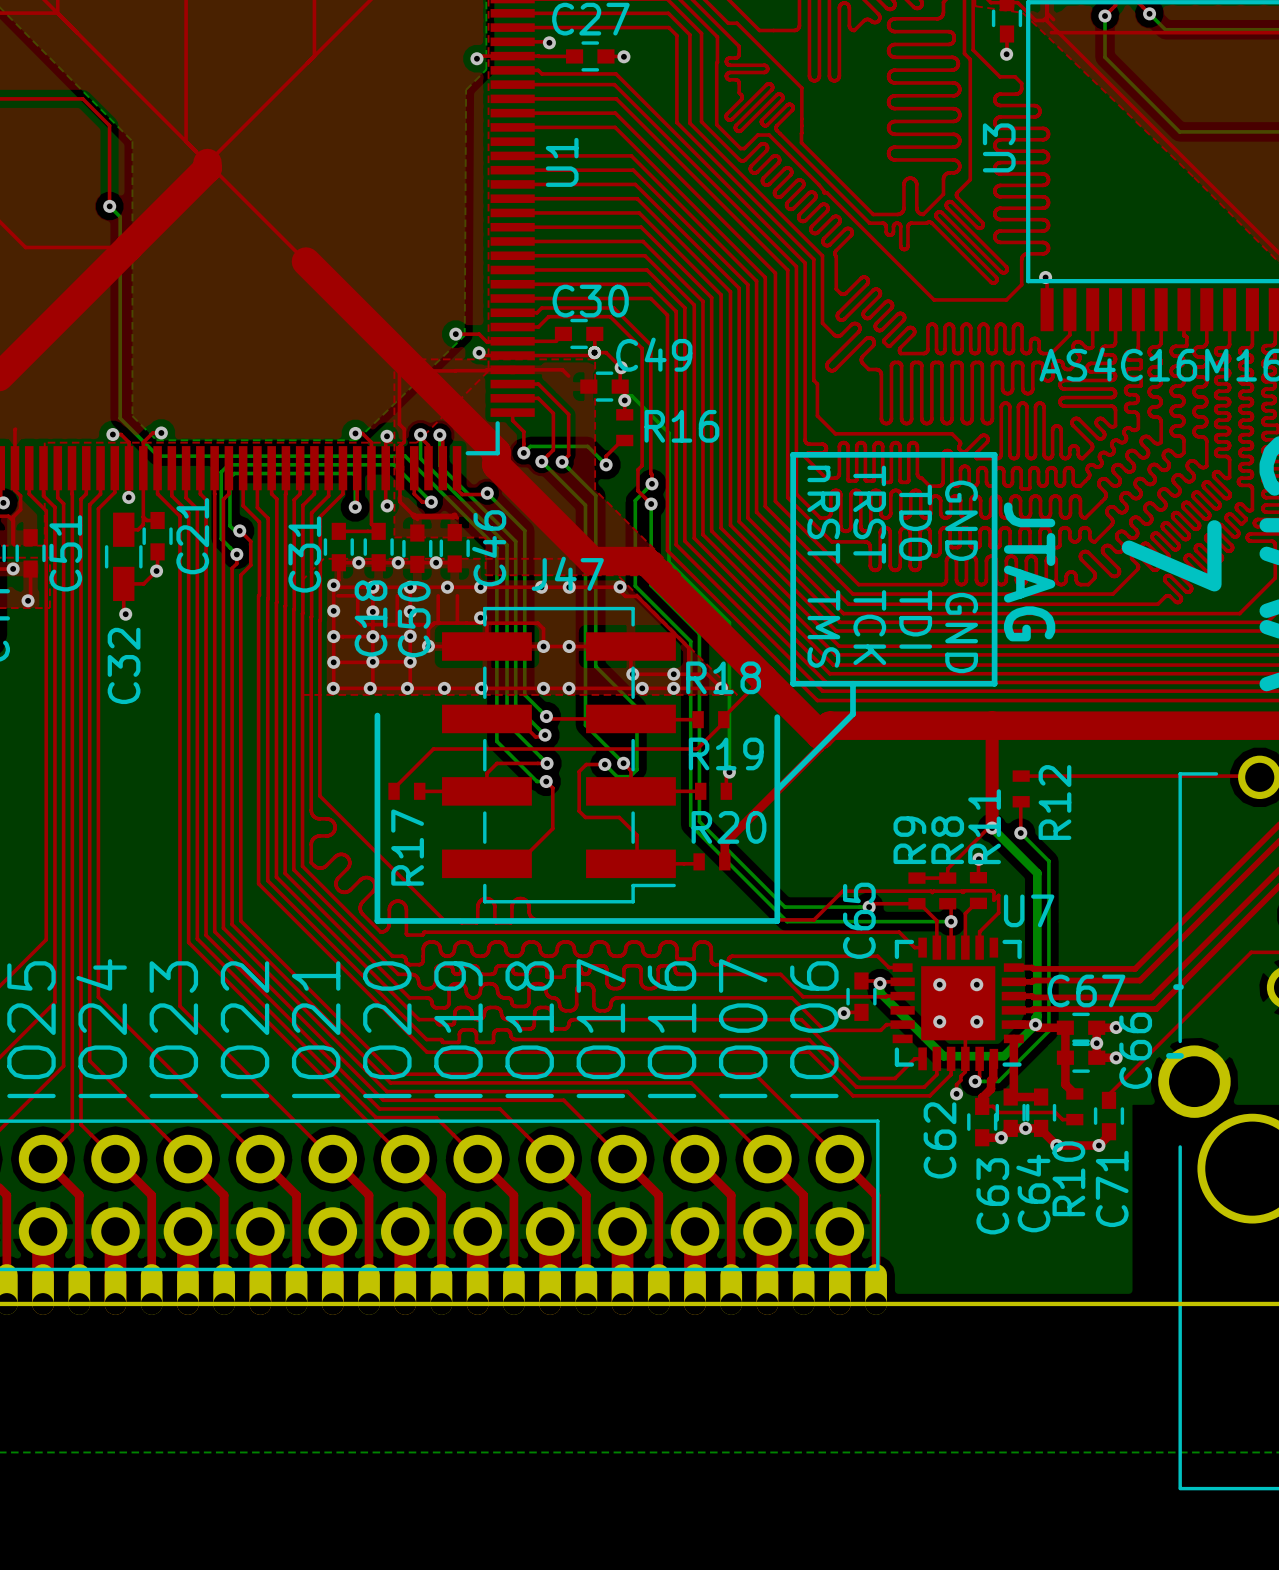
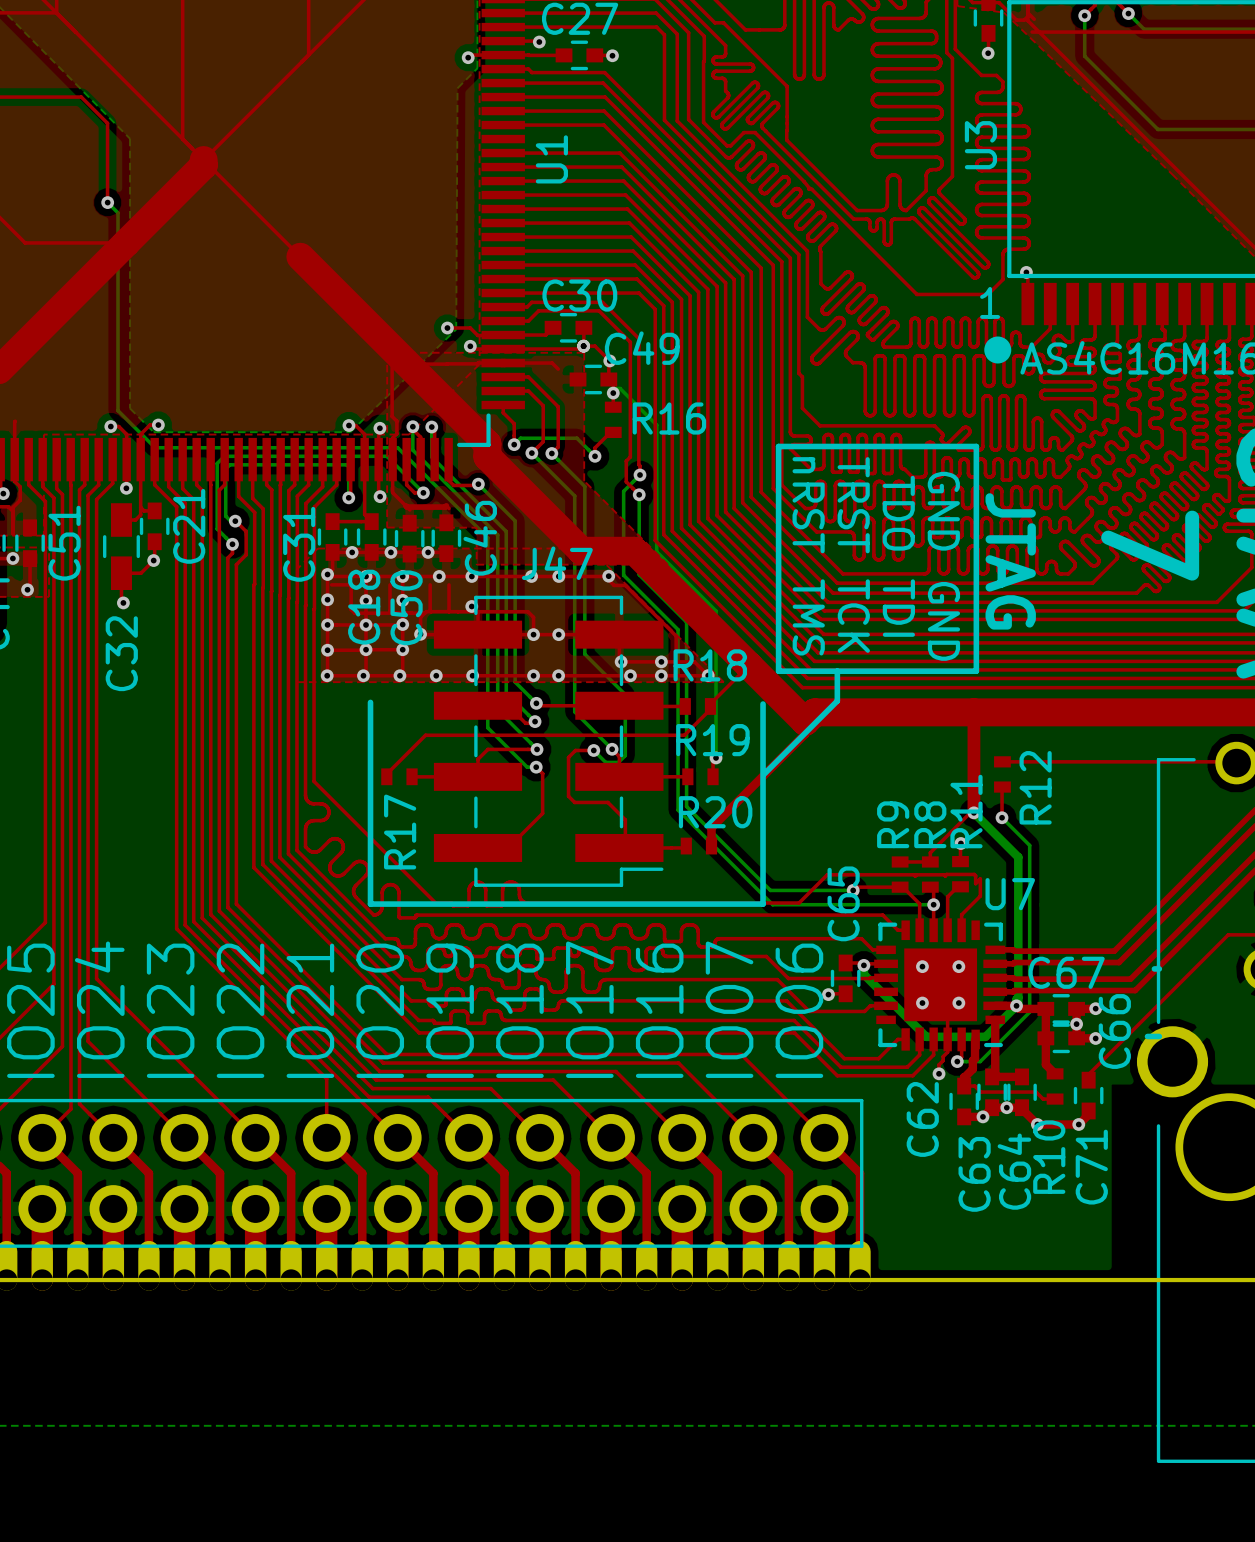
text: none -> 1 (990, 302)
drawing: none -> [984, 336, 1012, 364]
top track: (179, 946) (179, 1006) (332, 1159) -> (176, 928) (326, 1078) (326, 1137)

